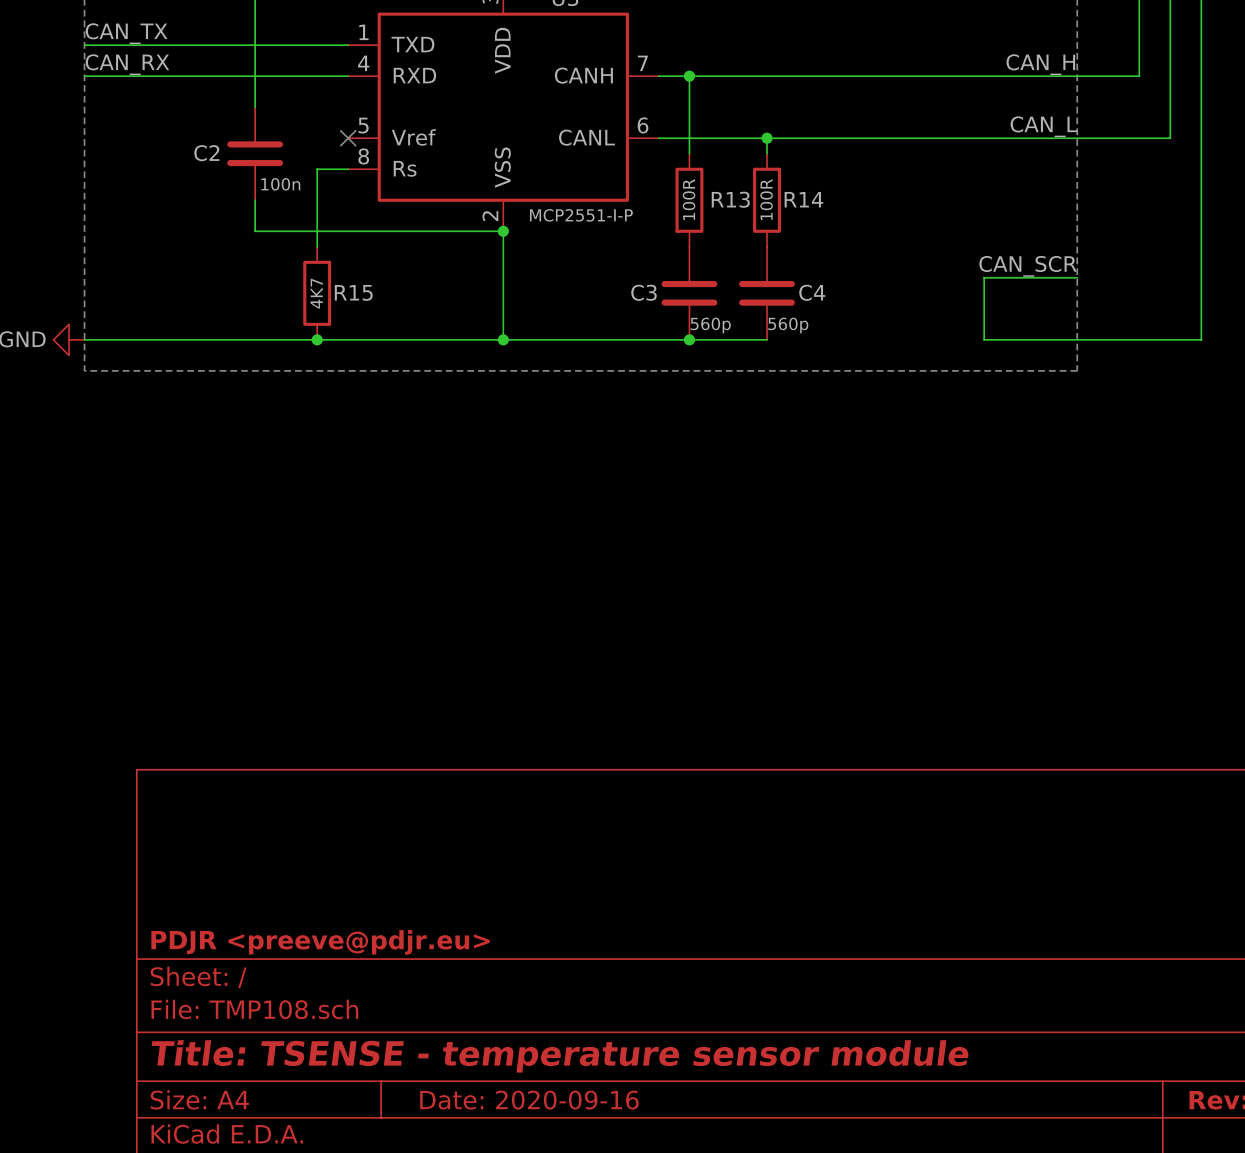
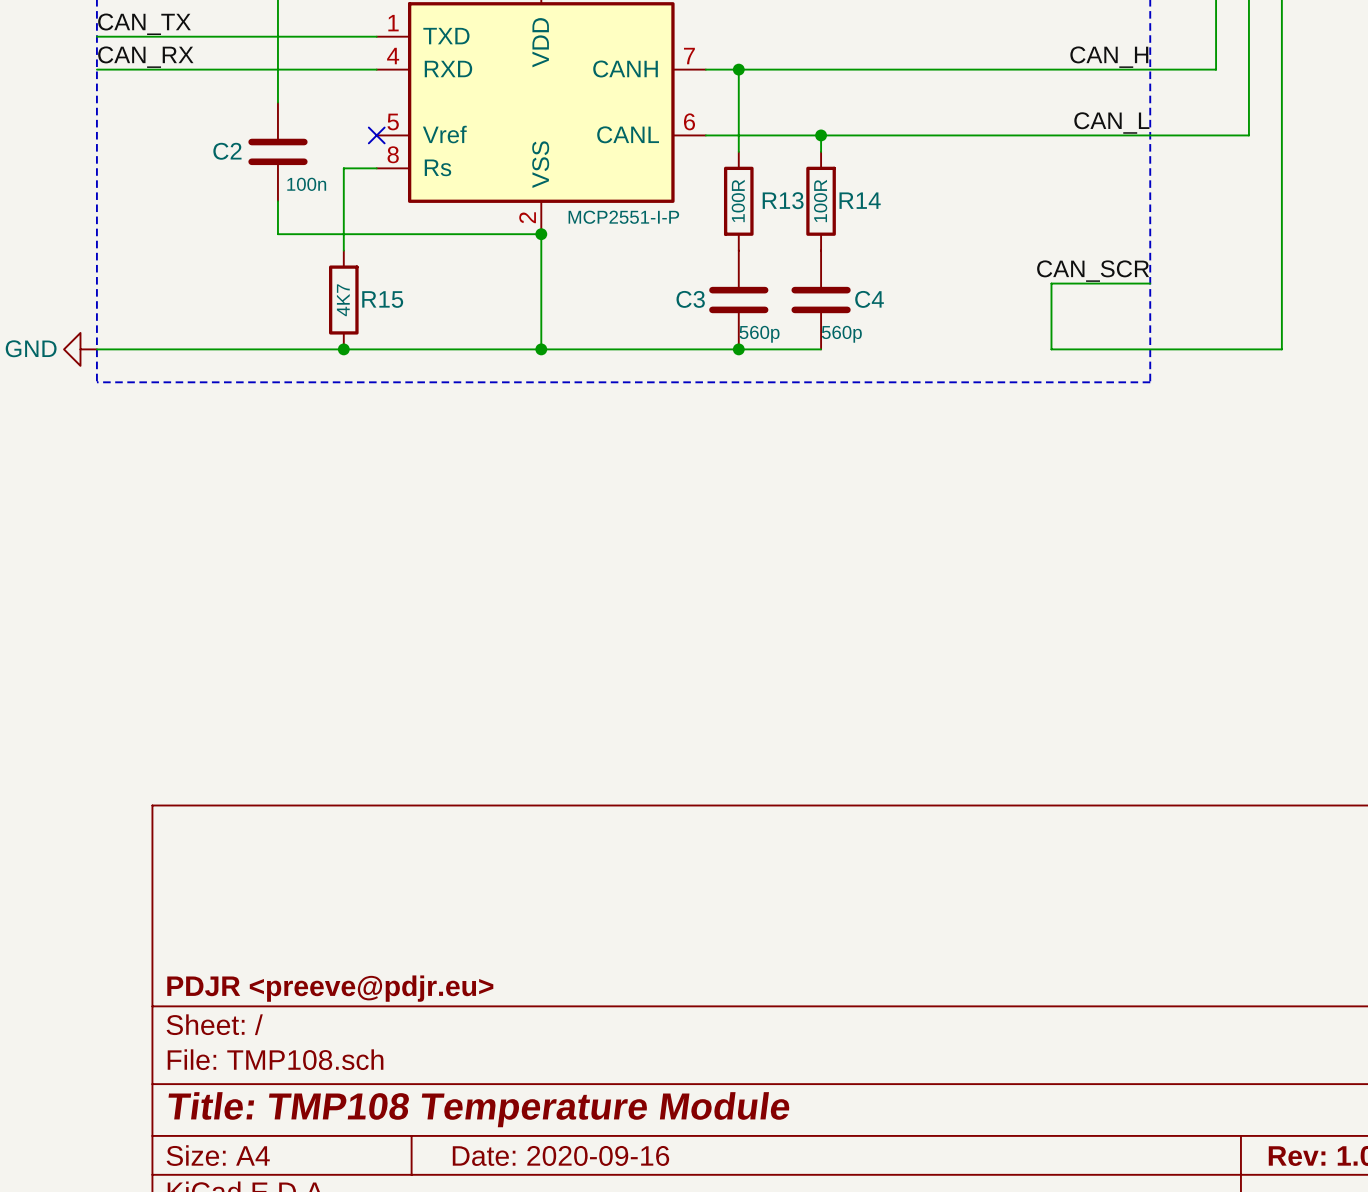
title block: Title: TSENSE - temperature sensor module (560, 1056) -> Title: TMP108 Temperature Module (479, 1109)

